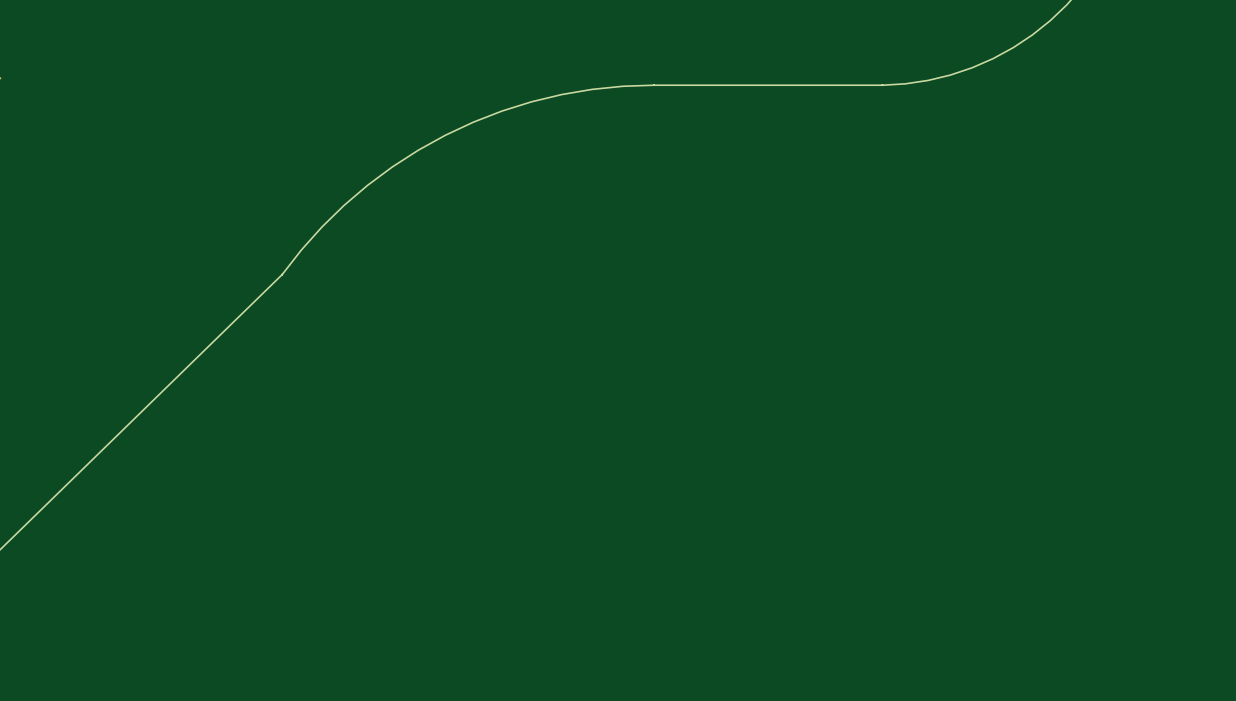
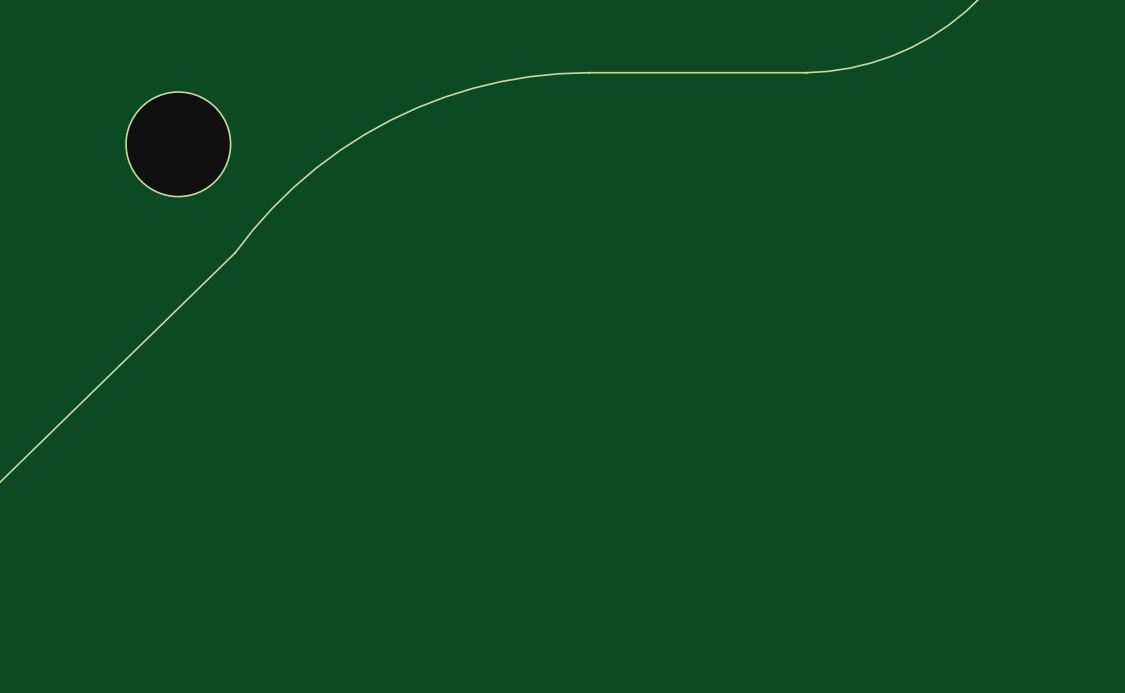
hole: none -> (178, 144)

